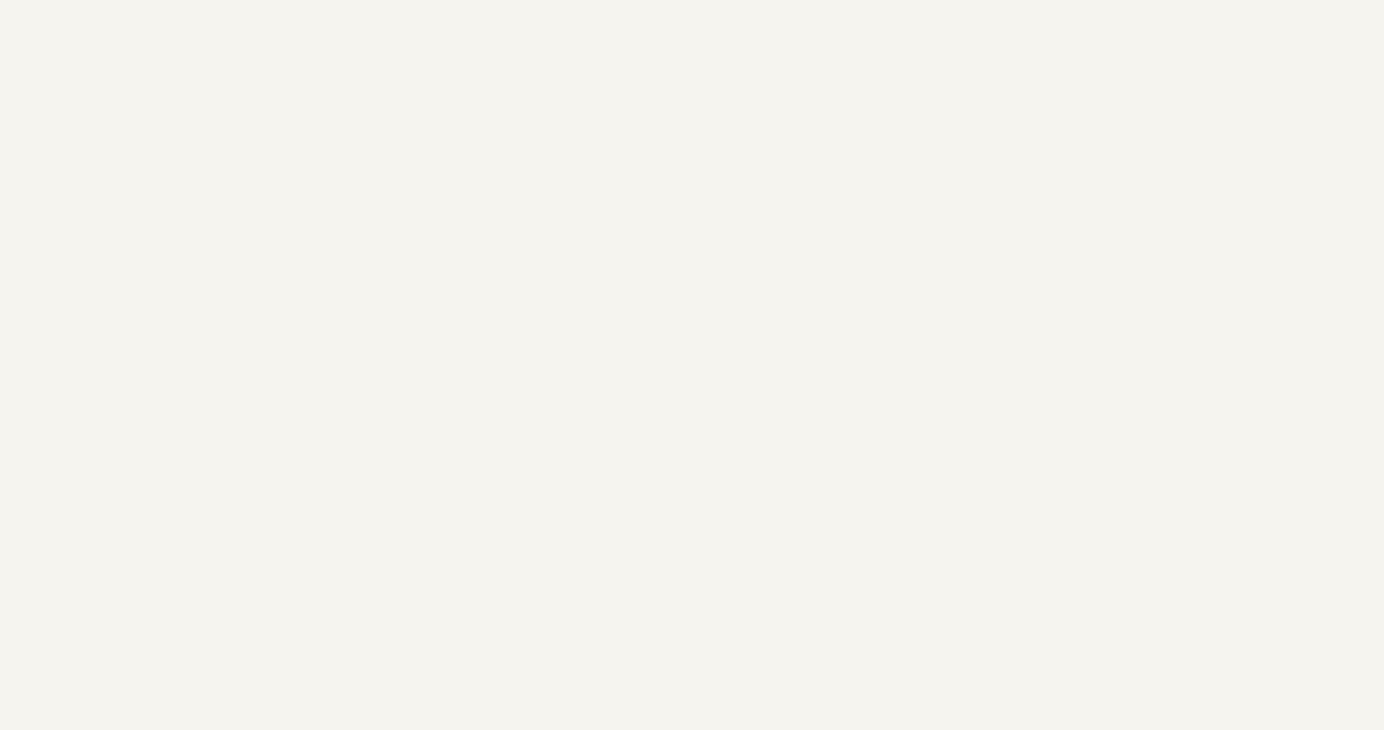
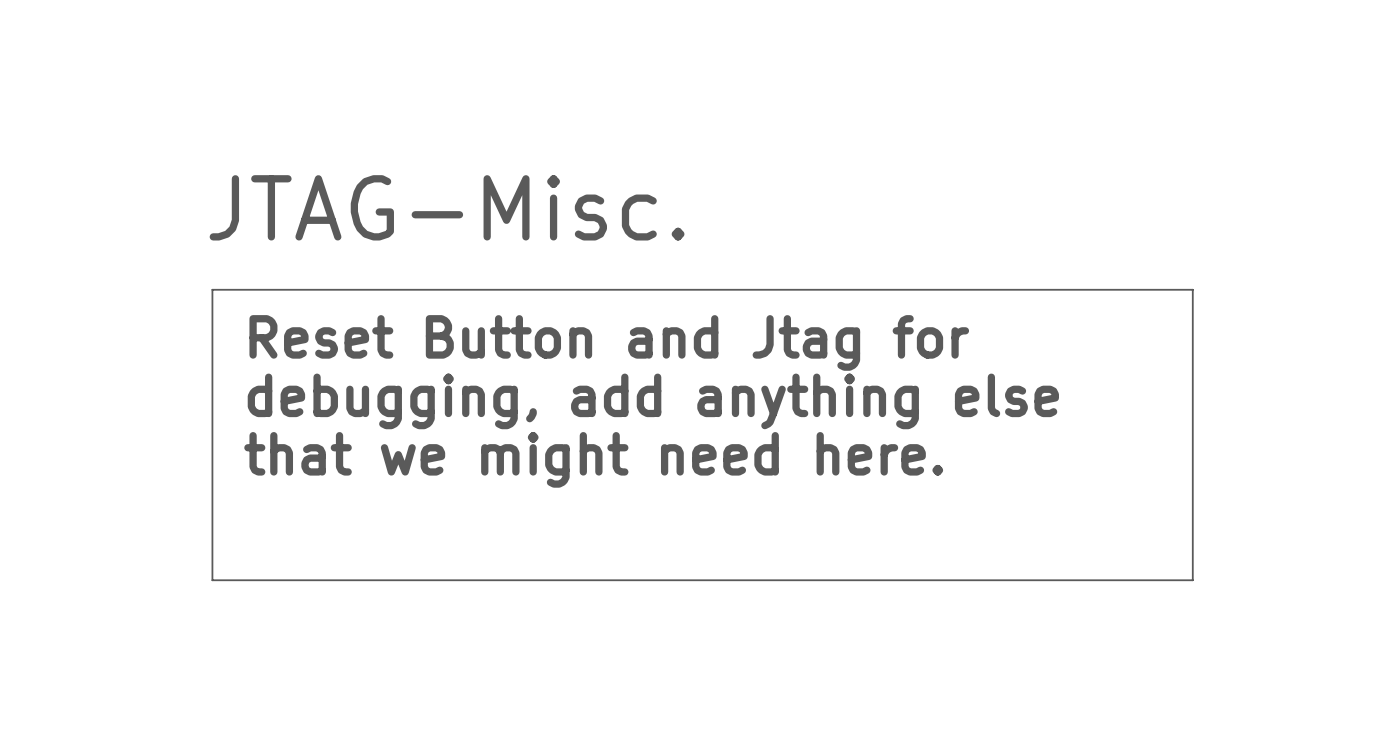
text: none -> JTAG-Misc. (447, 207)
line: none -> (212, 289) (1192, 289) (1192, 580) (212, 580) (212, 289)
text: none -> Reset Button and Jtag for (609, 342)
text: none -> debugging, add anything else (653, 401)
text: none -> that we might need here. (593, 459)

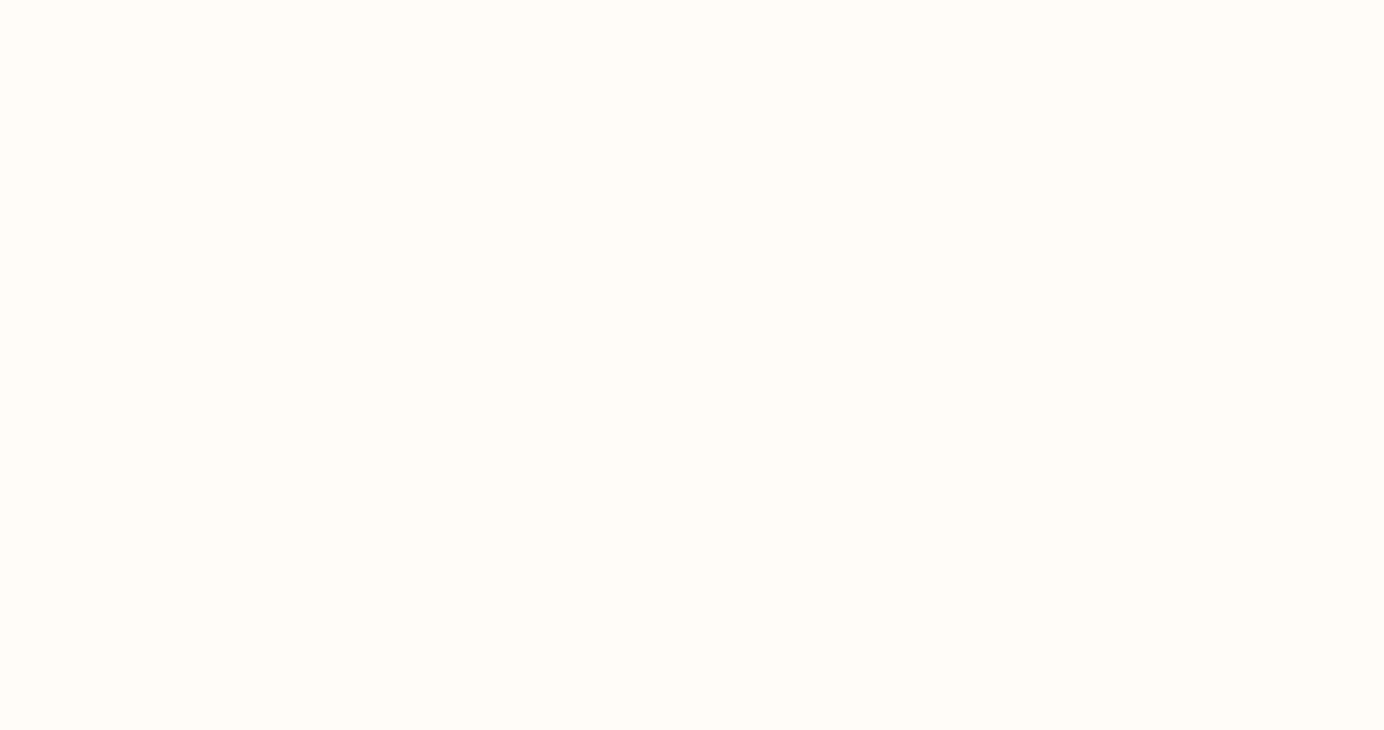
text: JTAG-Misc. (447, 207) -> none
line: (212, 289) (1192, 289) (1192, 580) (212, 580) (212, 289) -> none
text: Reset Button and Jtag for (609, 342) -> none
text: debugging, add anything else (653, 401) -> none
text: that we might need here. (593, 459) -> none

